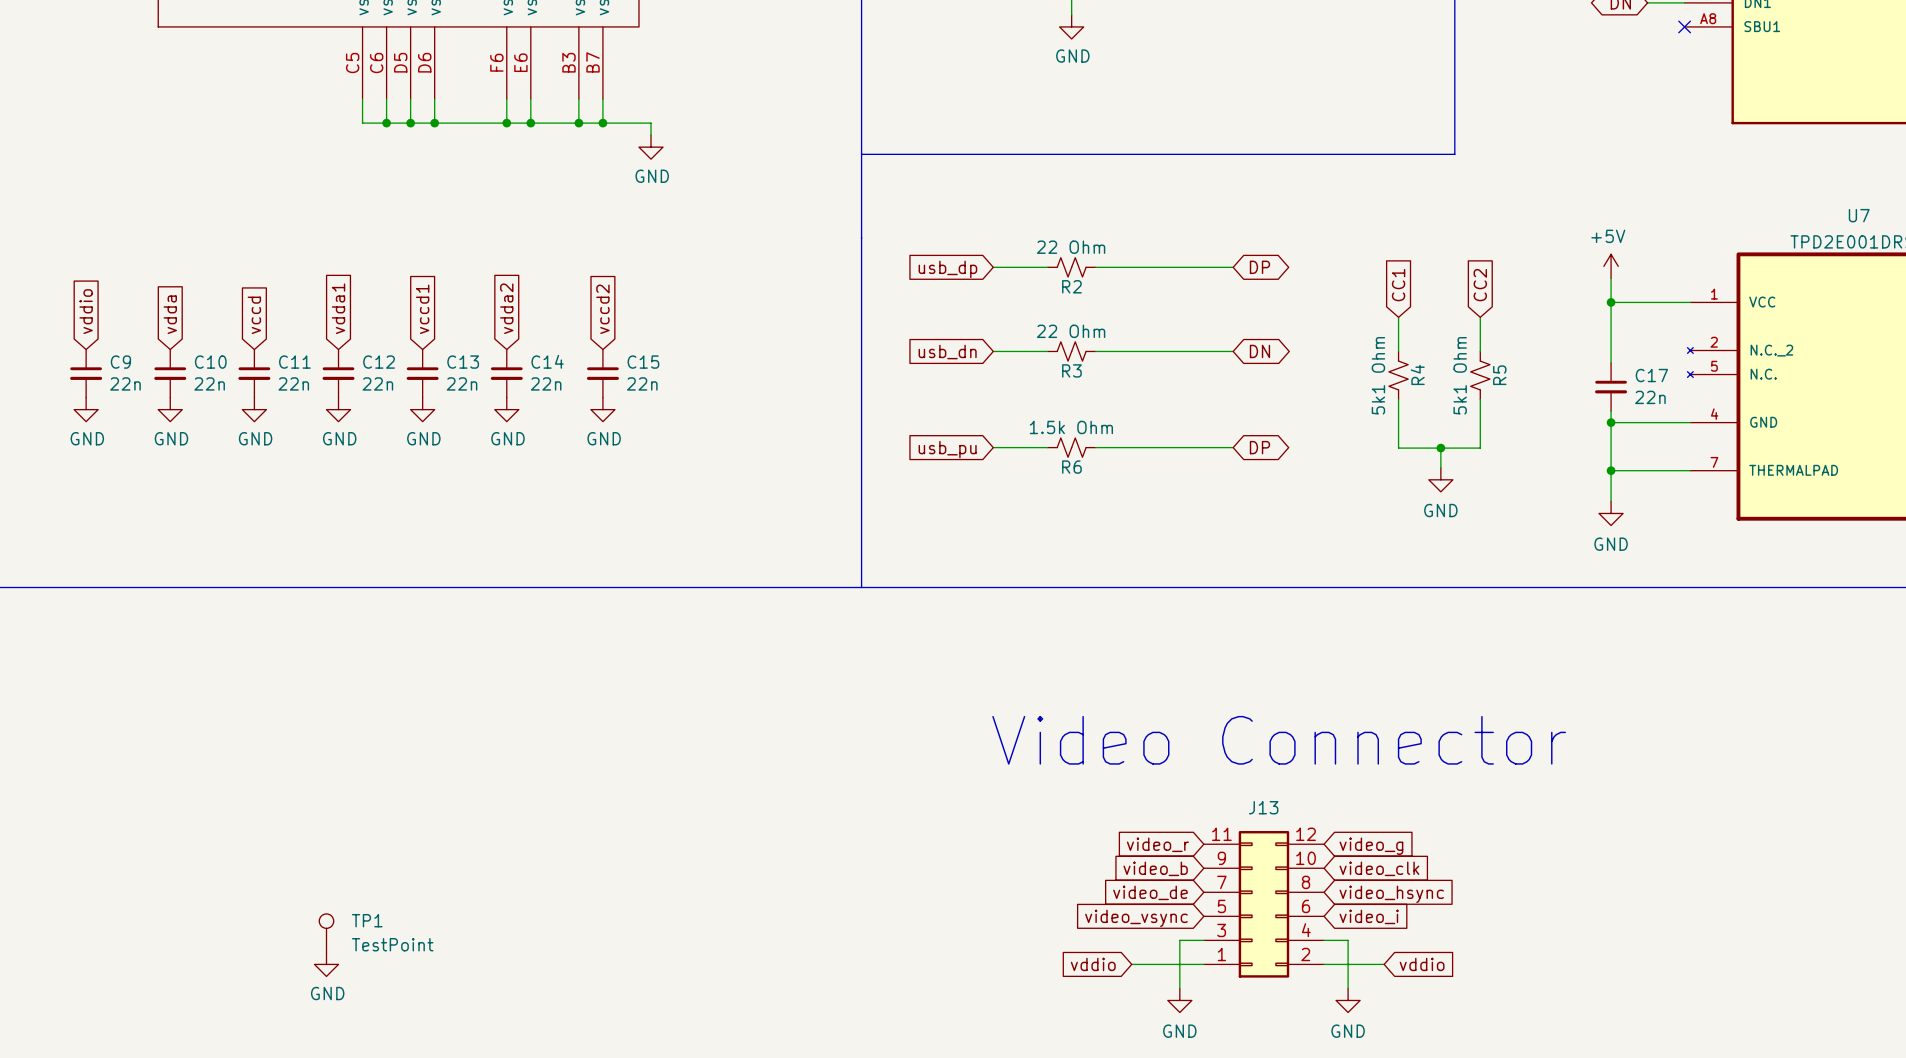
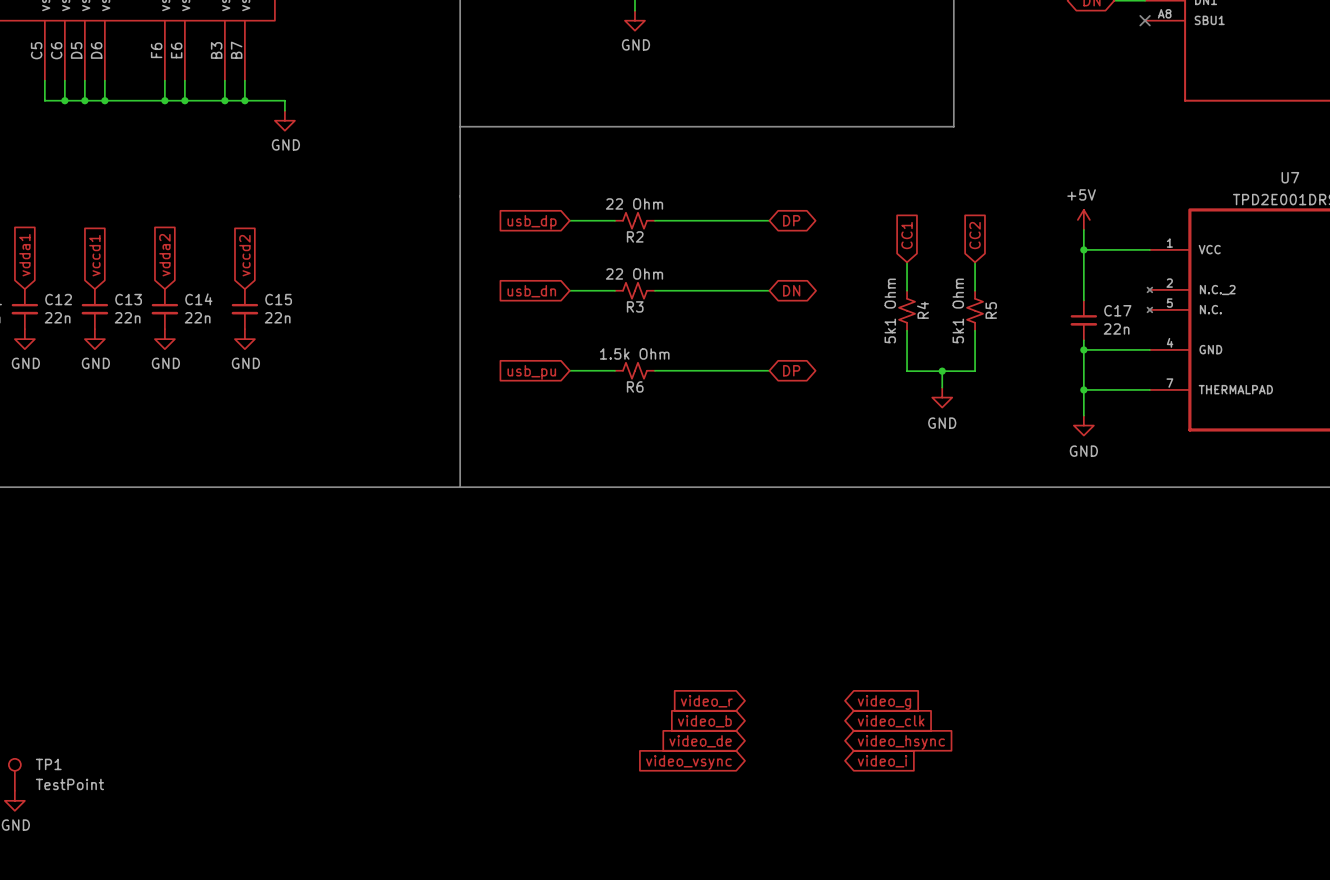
text: Video Connector (1279, 740) -> none
J13: (1263, 904) -> none
wire: (1203, 940) (1179, 940) (1179, 988) -> none
wire: (1324, 940) (1348, 940) (1348, 988) -> none
global label: vddio (1093, 964) -> none
wire: (1131, 964) (1203, 964) -> none
wire: (1324, 964) (1384, 964) -> none
global label: vddio (1422, 964) -> none
power symbol: GND (1179, 1000) -> none
power symbol: GND (1348, 1000) -> none

